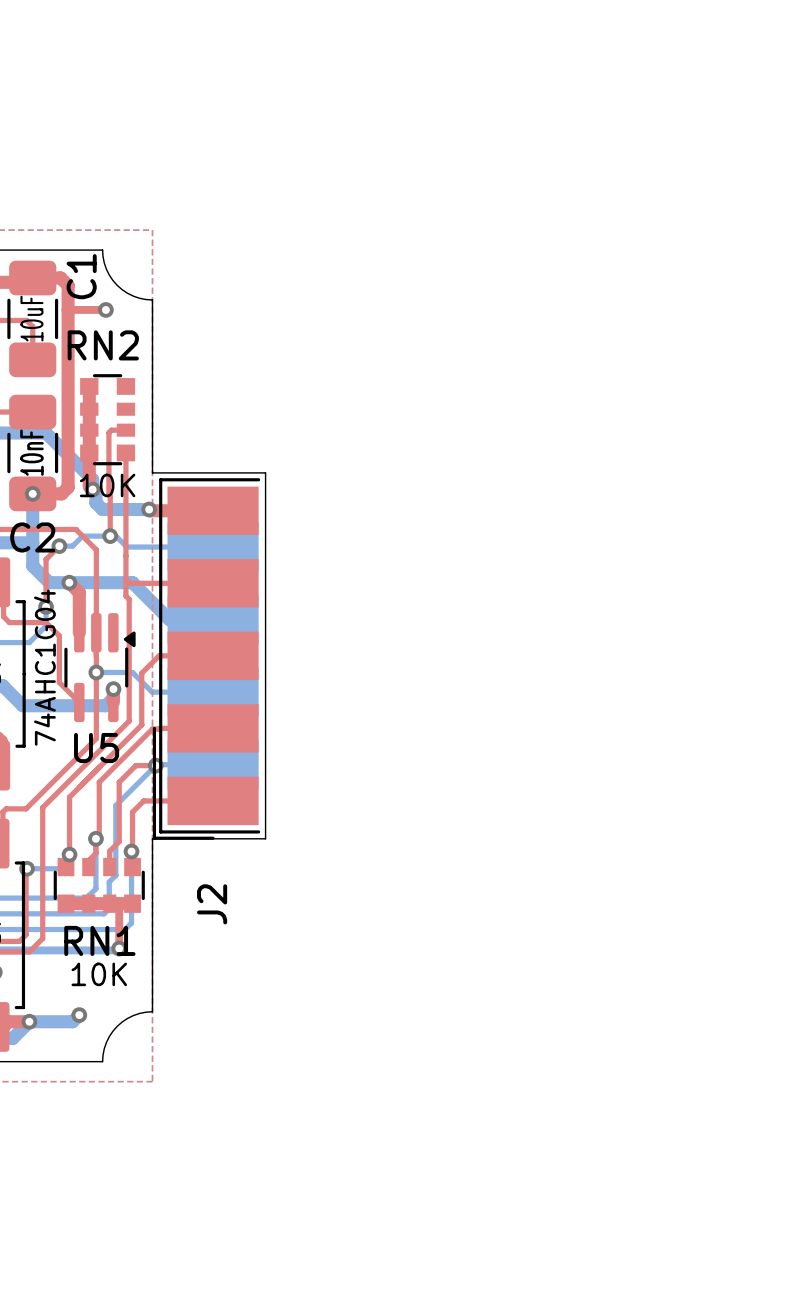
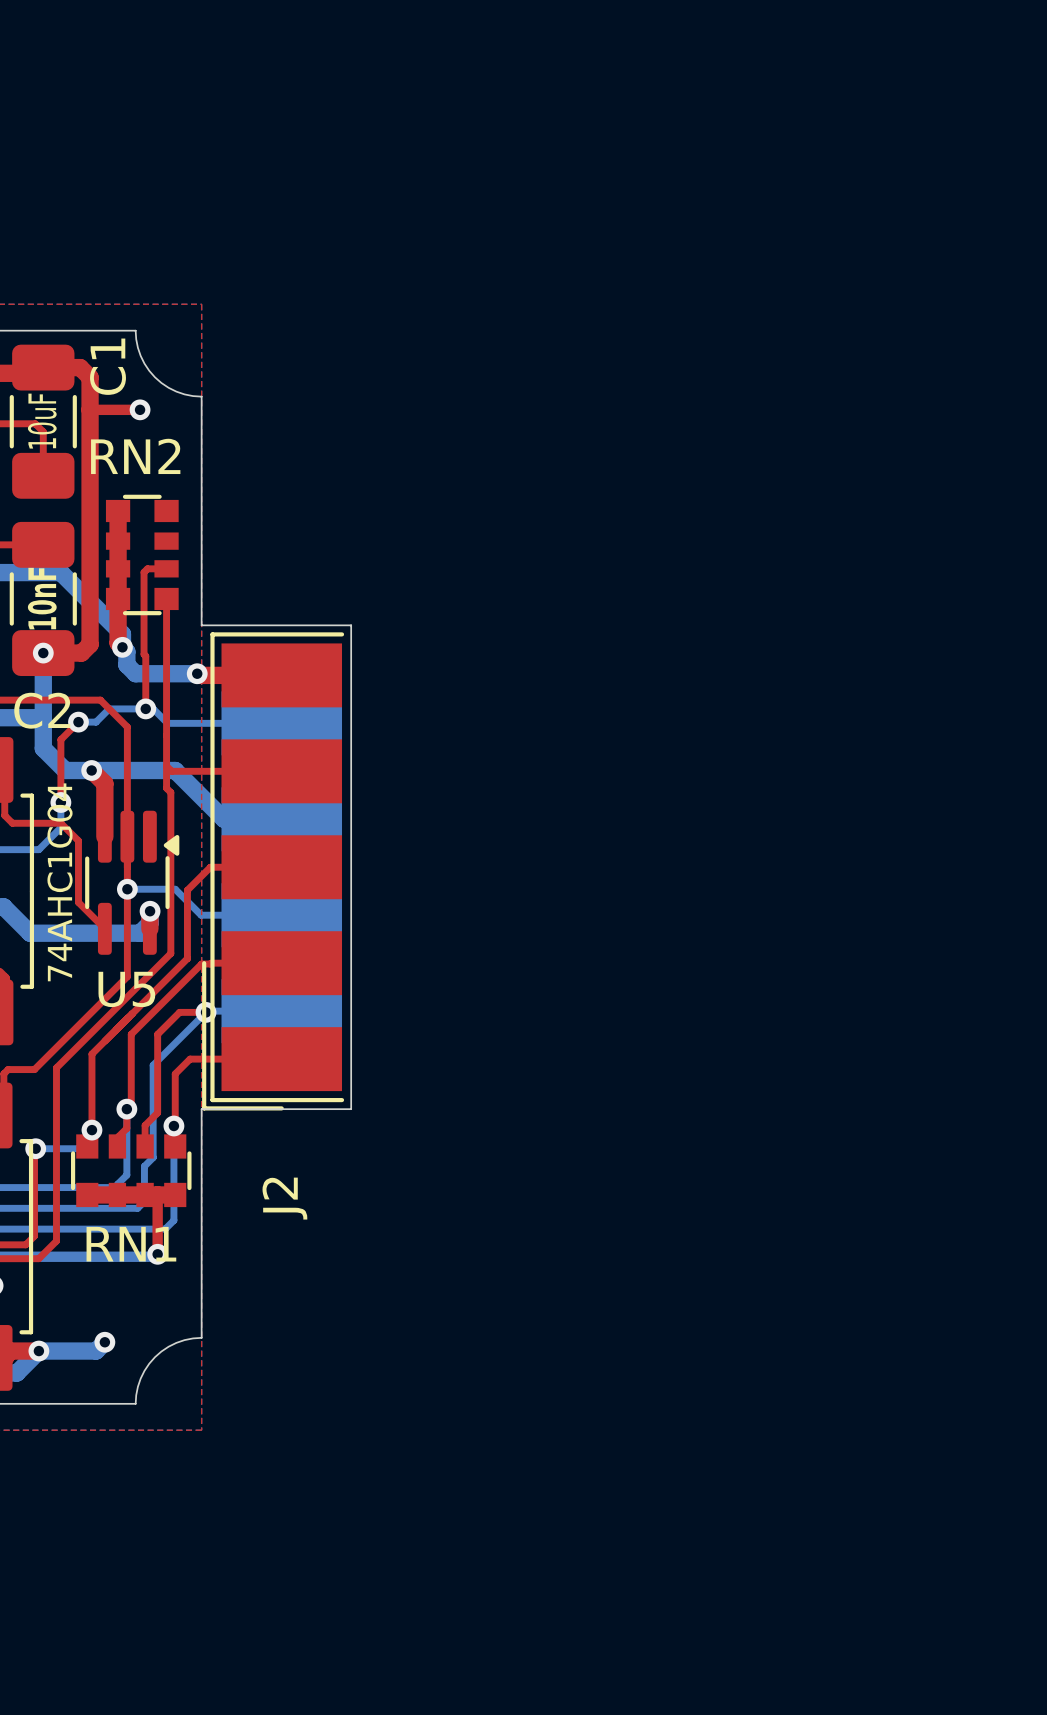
RN2 value: 10K (107, 485) -> none
RN1 value: 10K (99, 974) -> none

